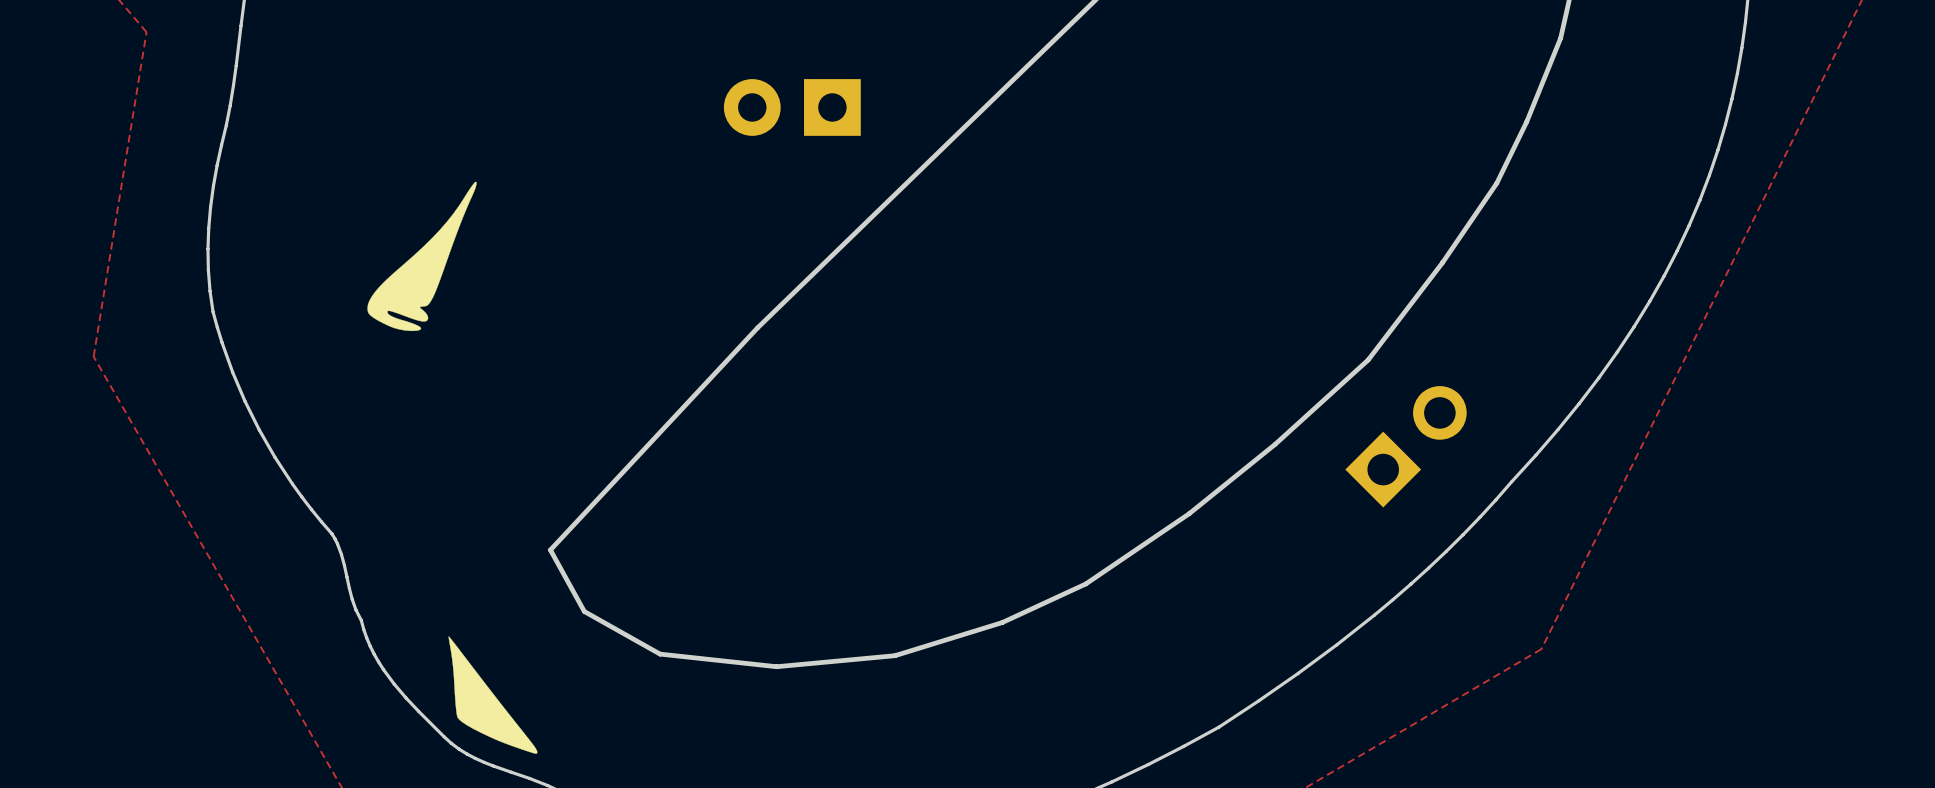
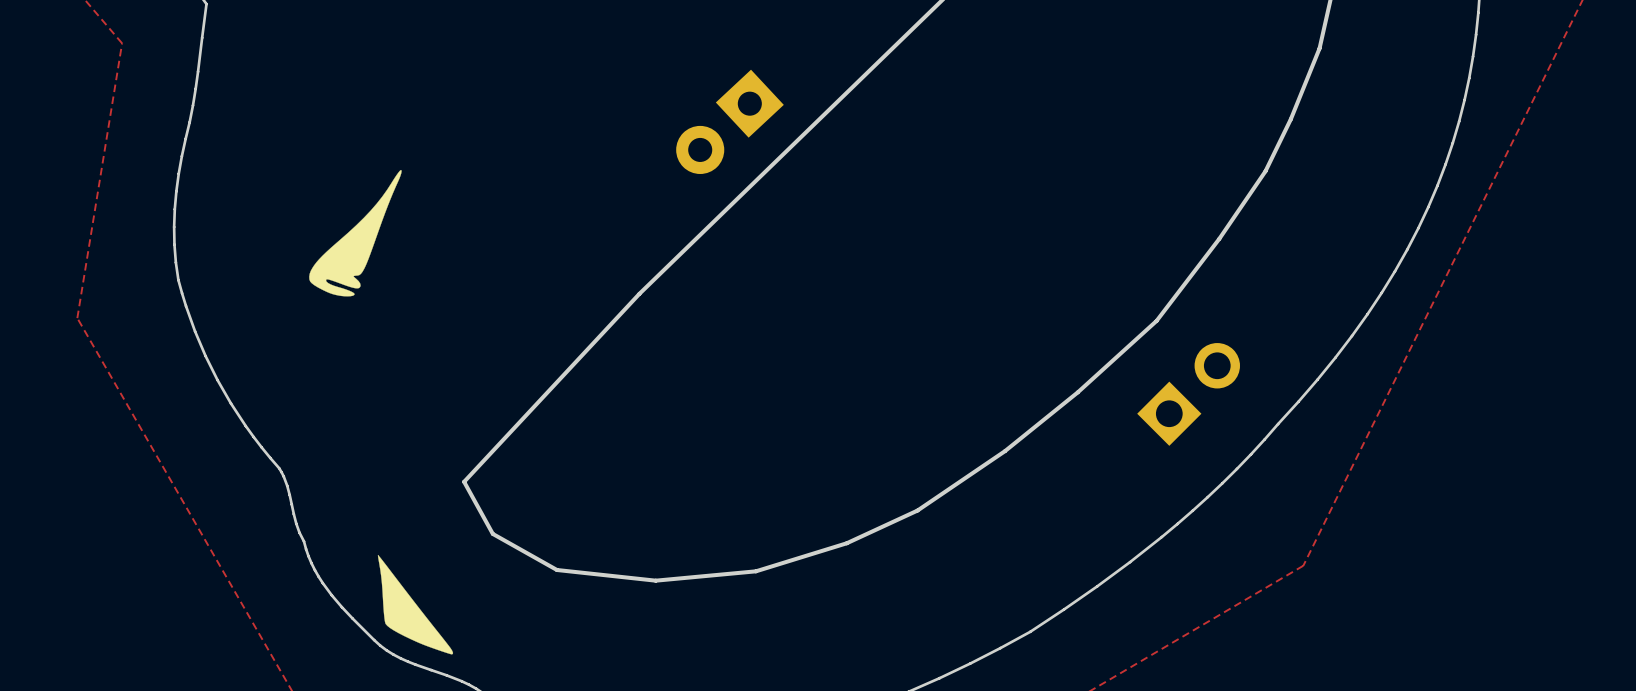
part: (792, 107) -> none
part: none -> (729, 121)

